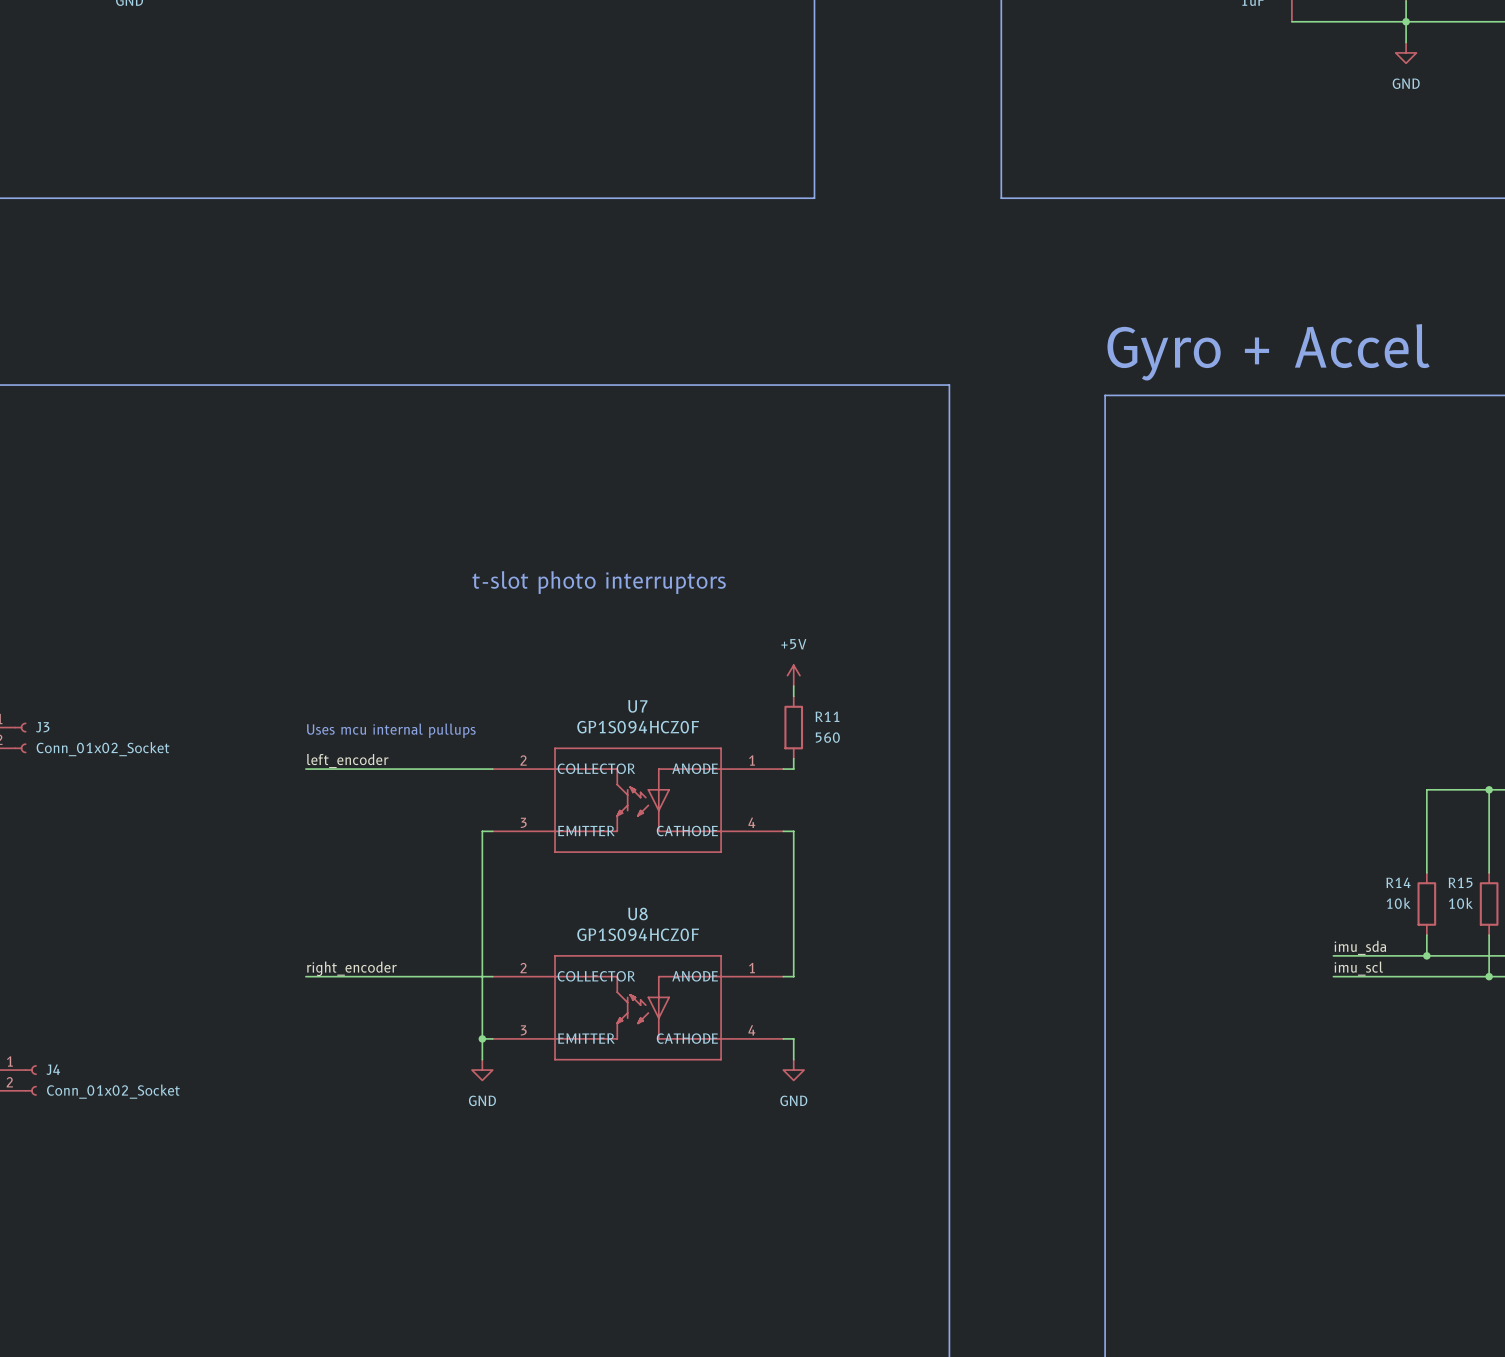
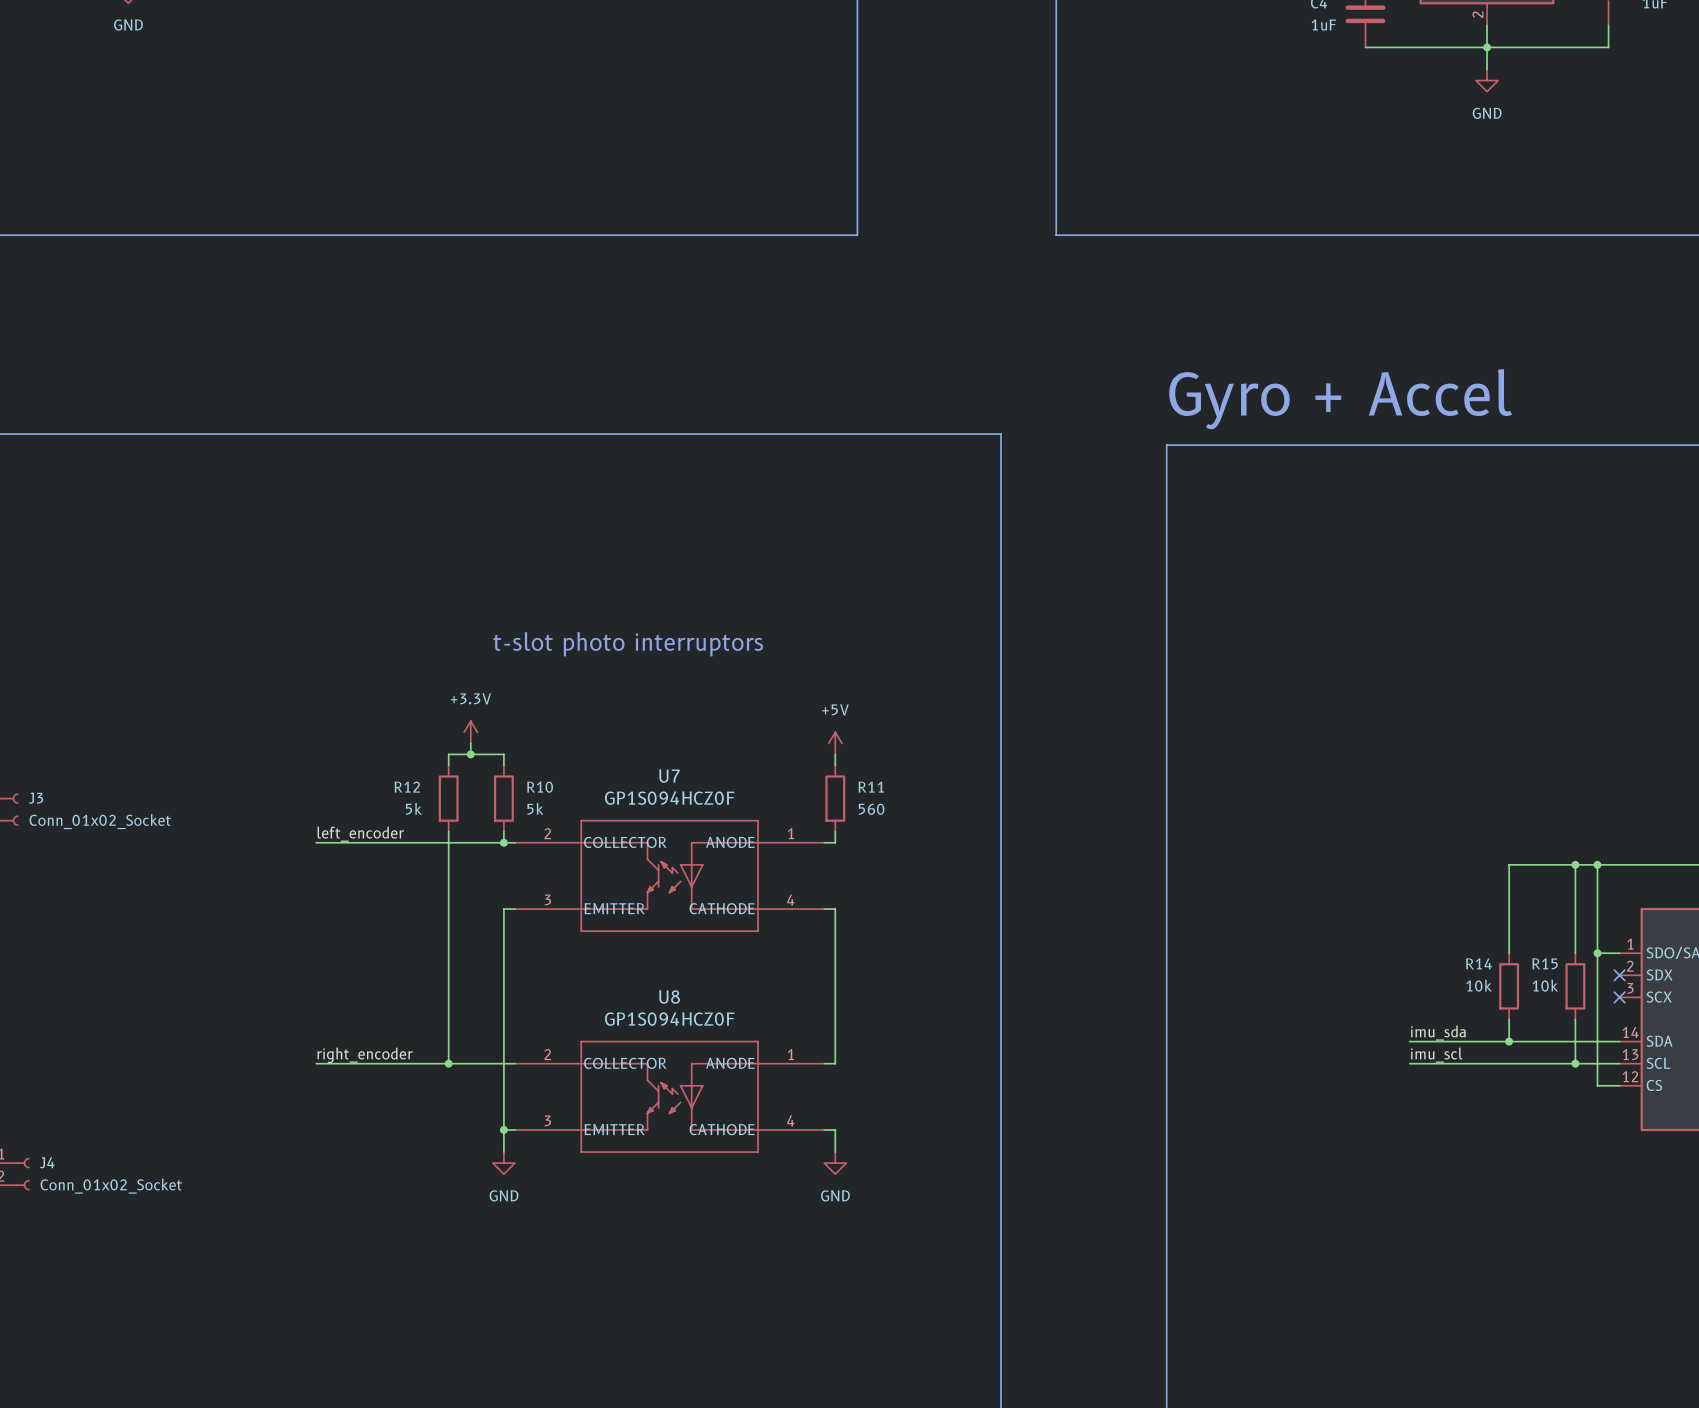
power symbol: none -> +3.3V (470, 732)
wire: none -> (470, 743) (470, 754)
junction: none -> (470, 754)
wire: none -> (448, 765) (448, 754) (503, 754) (503, 765)
R12: none -> 5k (448, 798)
R10: none -> 5k (503, 798)
text: Uses mcu internal pullups (391, 730) -> none
wire: none -> (448, 831) (448, 1063)
wire: none -> (503, 831) (503, 842)
junction: none -> (503, 842)
junction: none -> (448, 1063)

